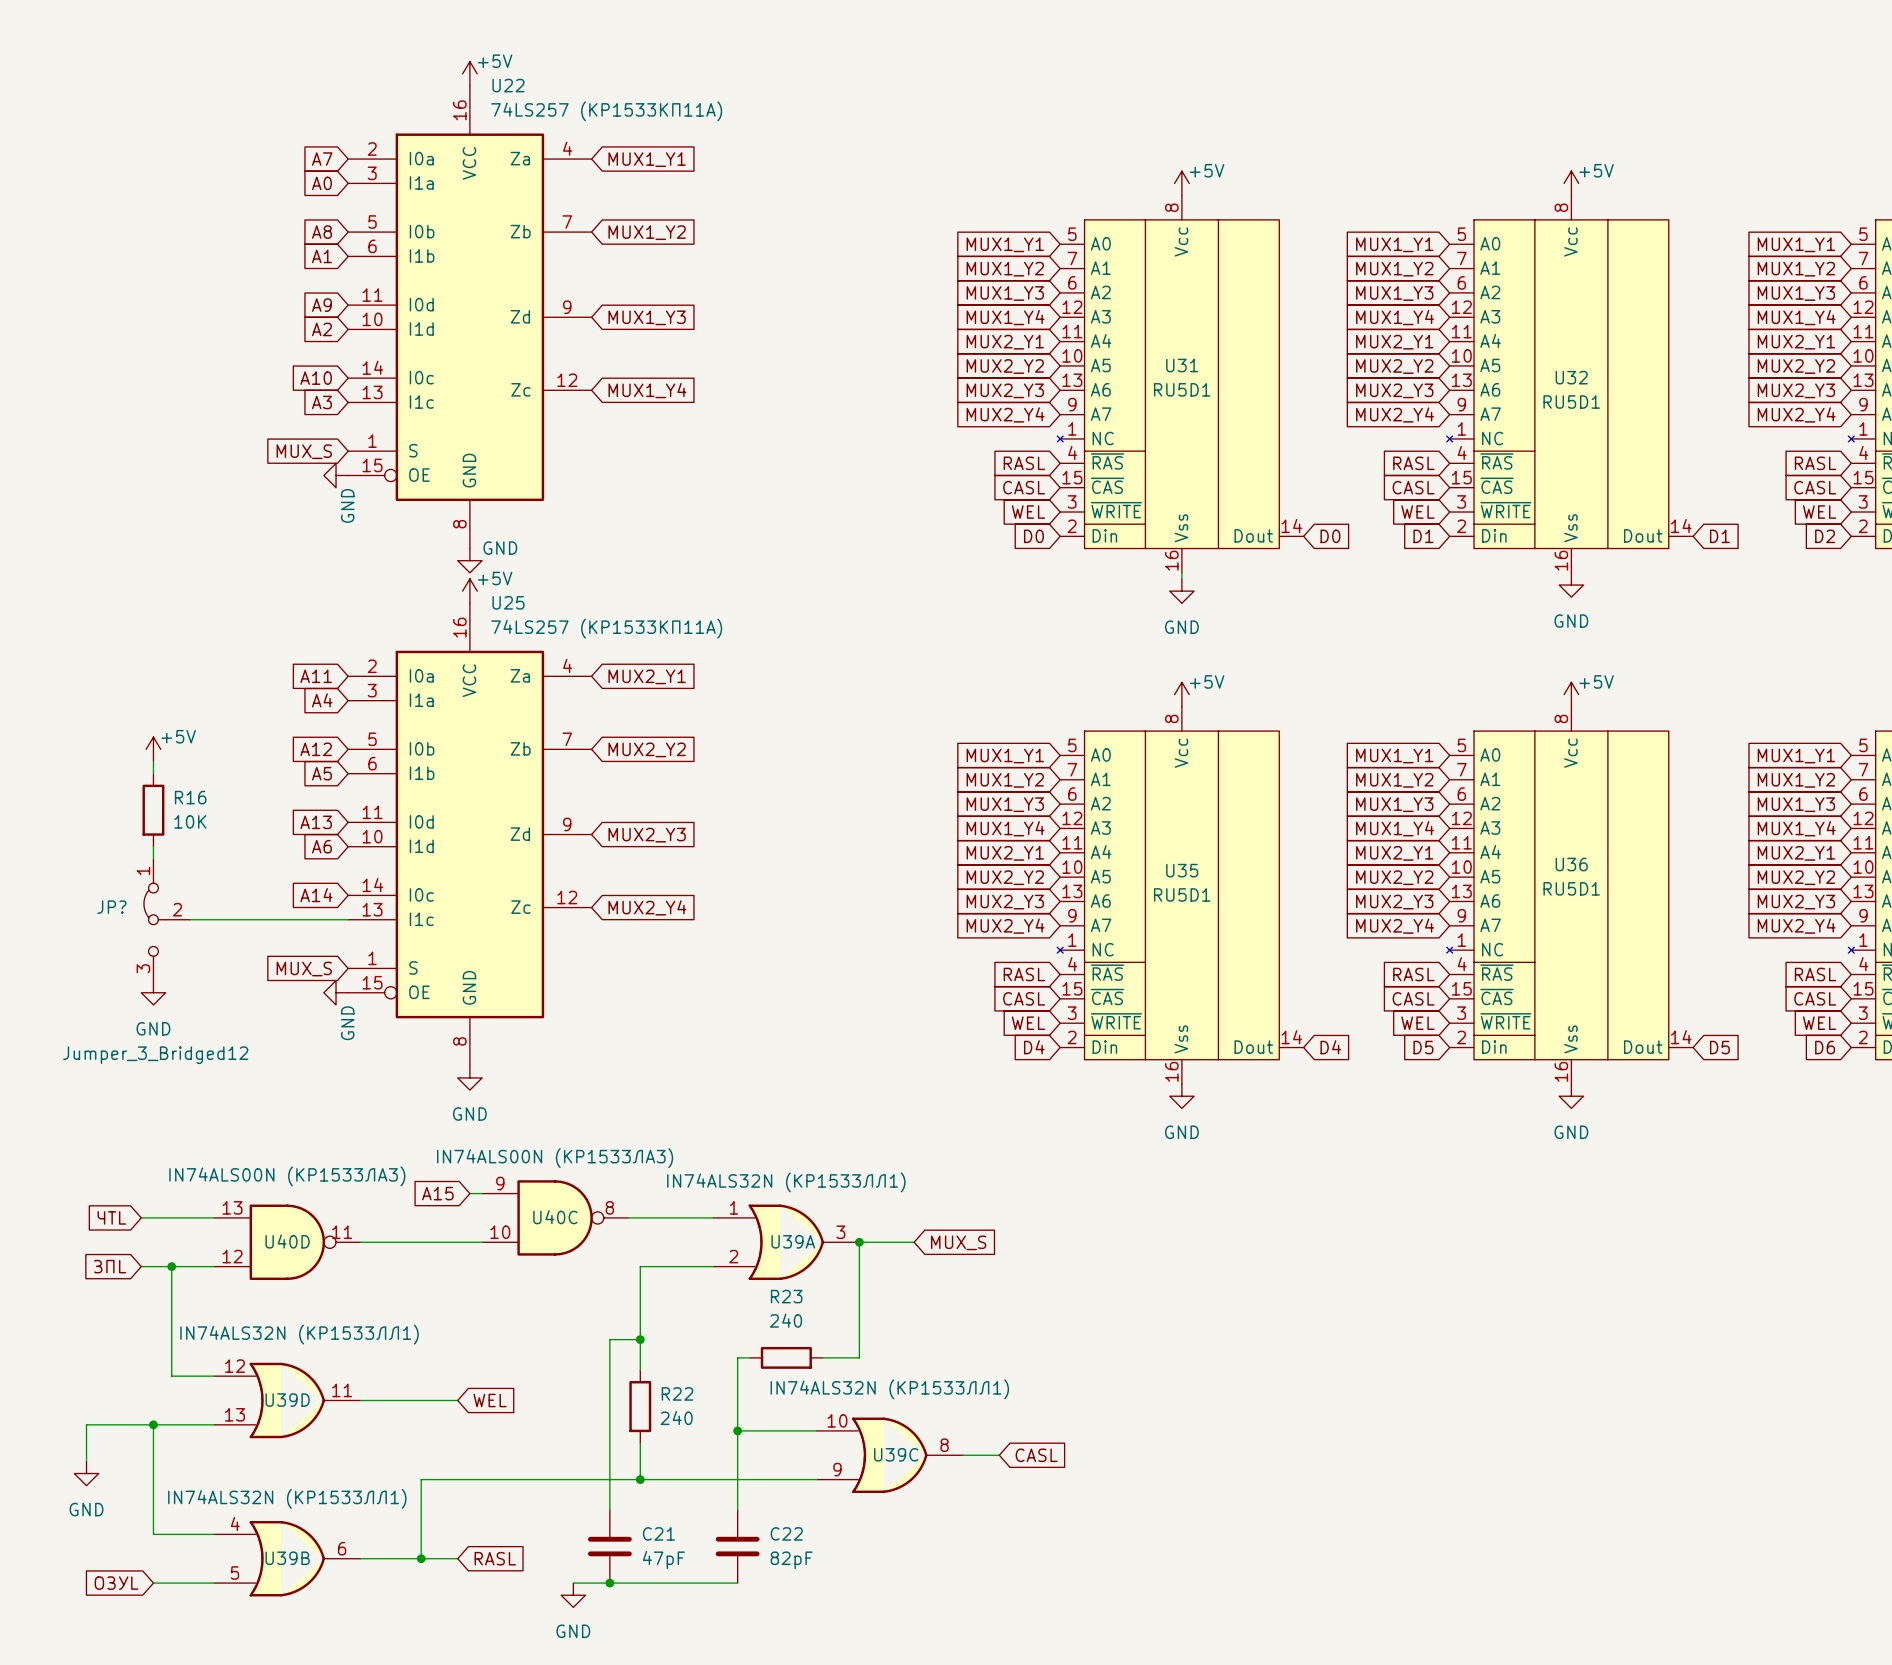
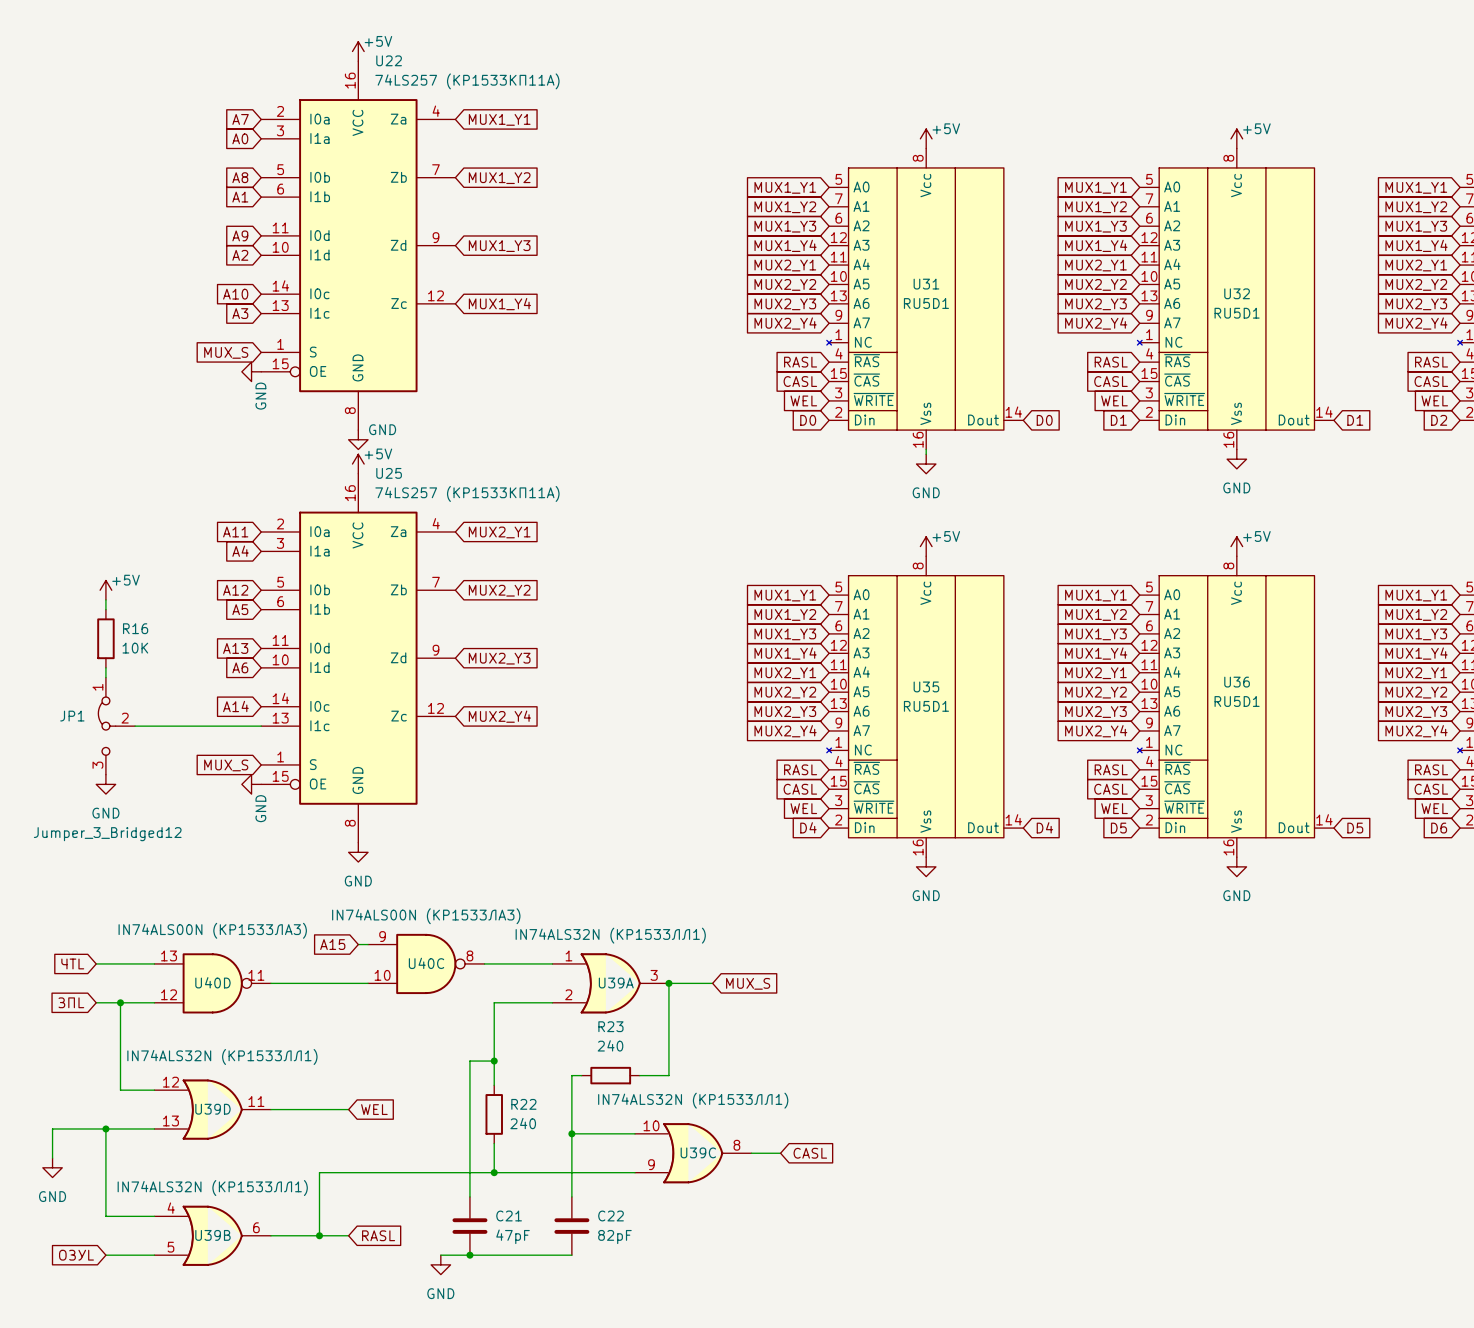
JP? name: JP? (111, 907) -> JP1 (72, 716)

